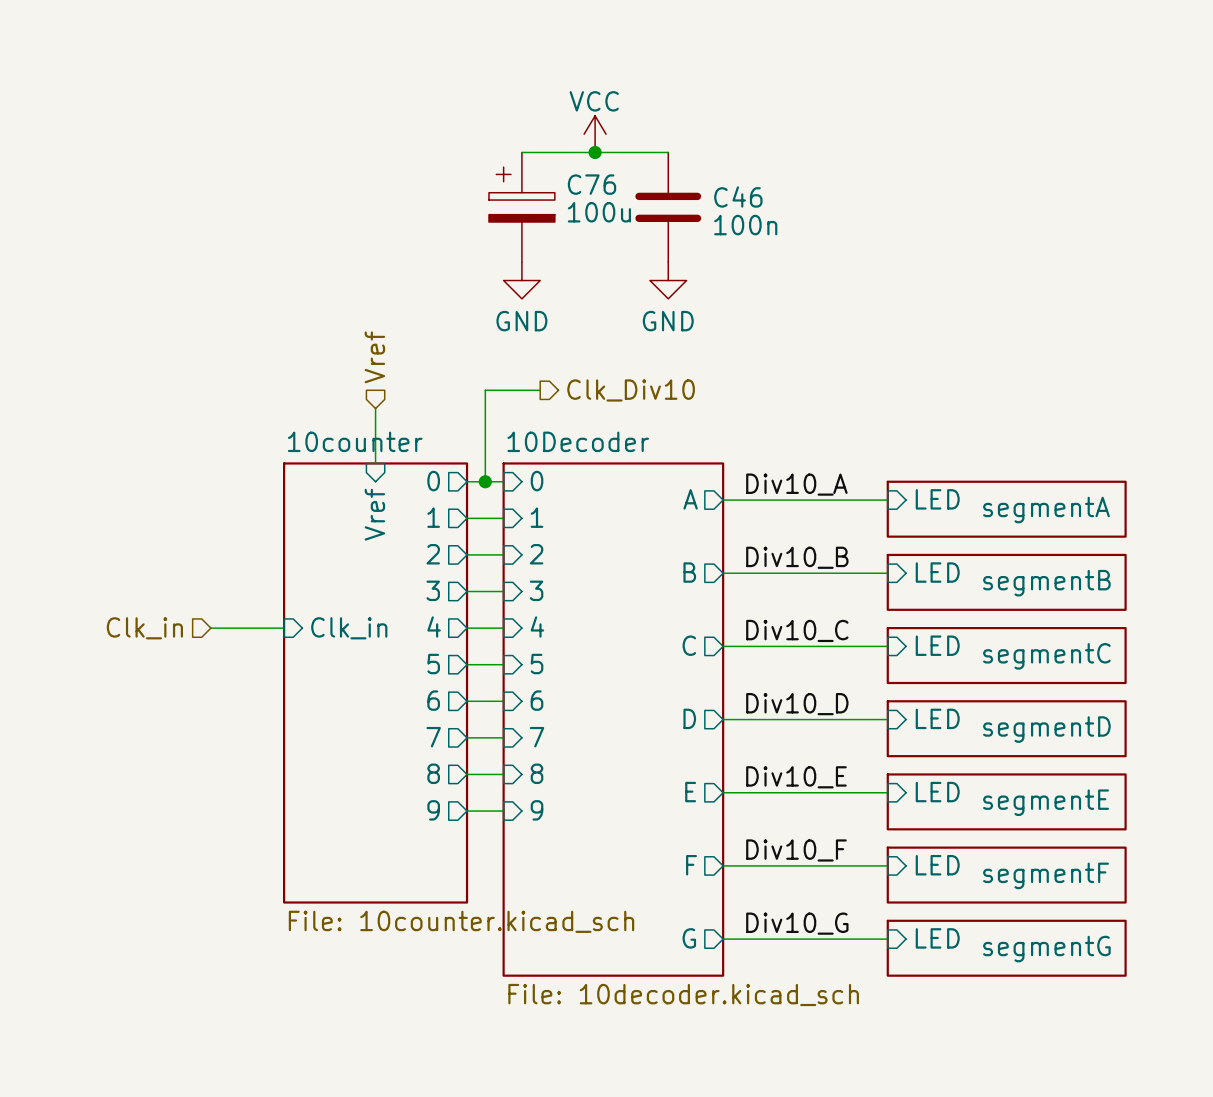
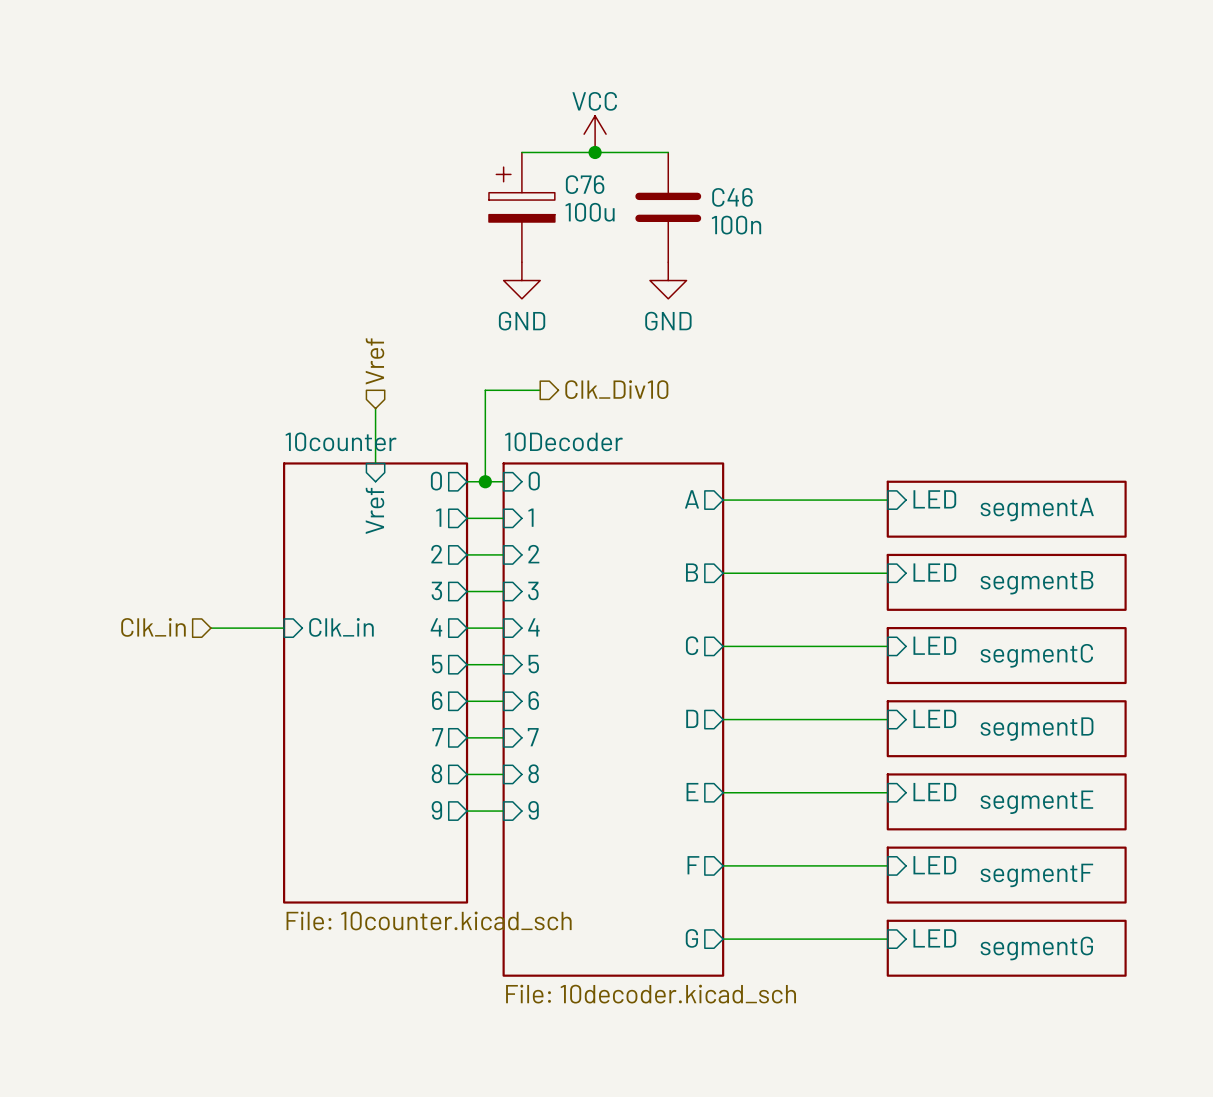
label: Div10_A (796, 484) -> none
label: Div10_B (797, 557) -> none
label: Div10_C (797, 630) -> none
label: Div10_D (797, 704) -> none
label: Div10_E (796, 777) -> none
label: Div10_F (796, 850) -> none
label: Div10_G (797, 923) -> none

